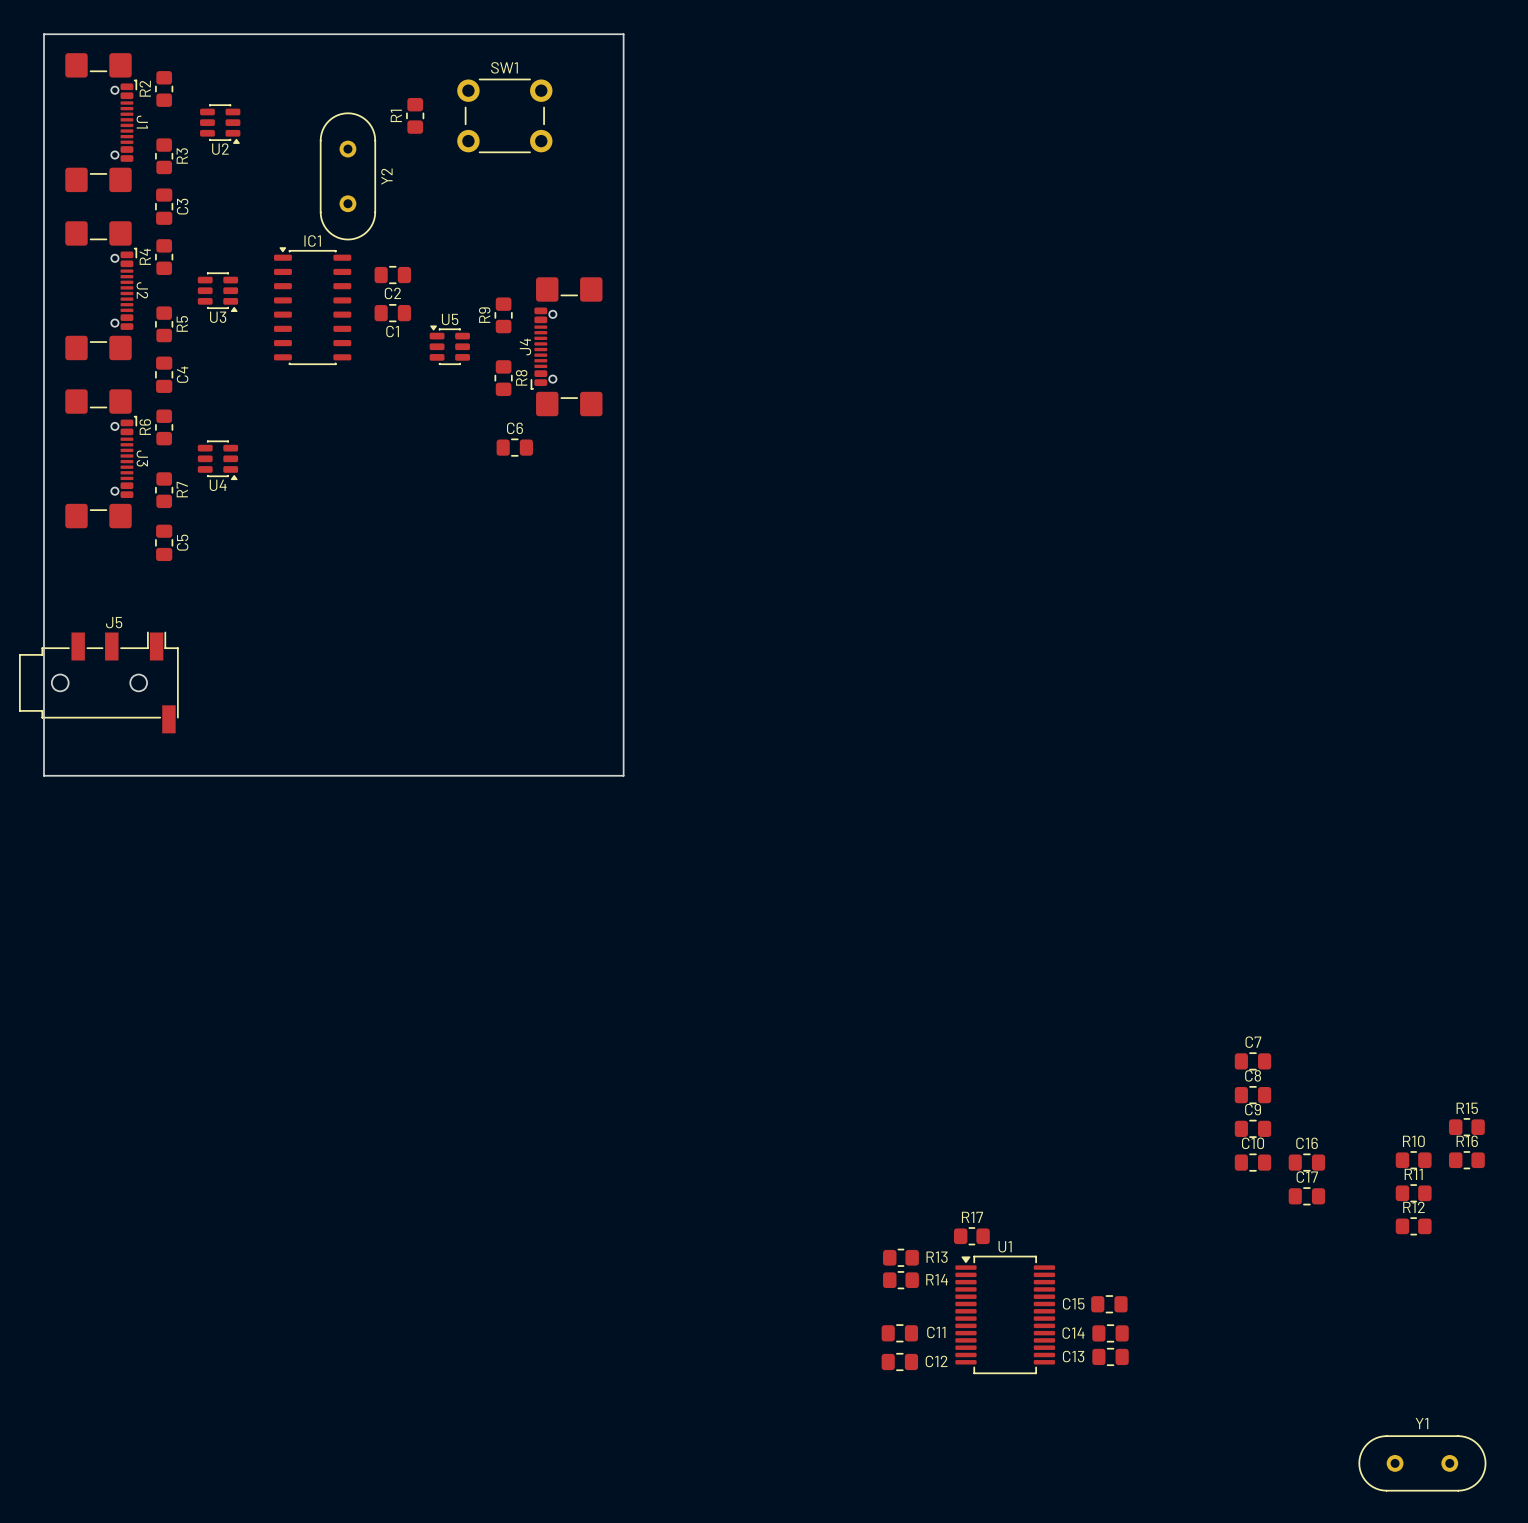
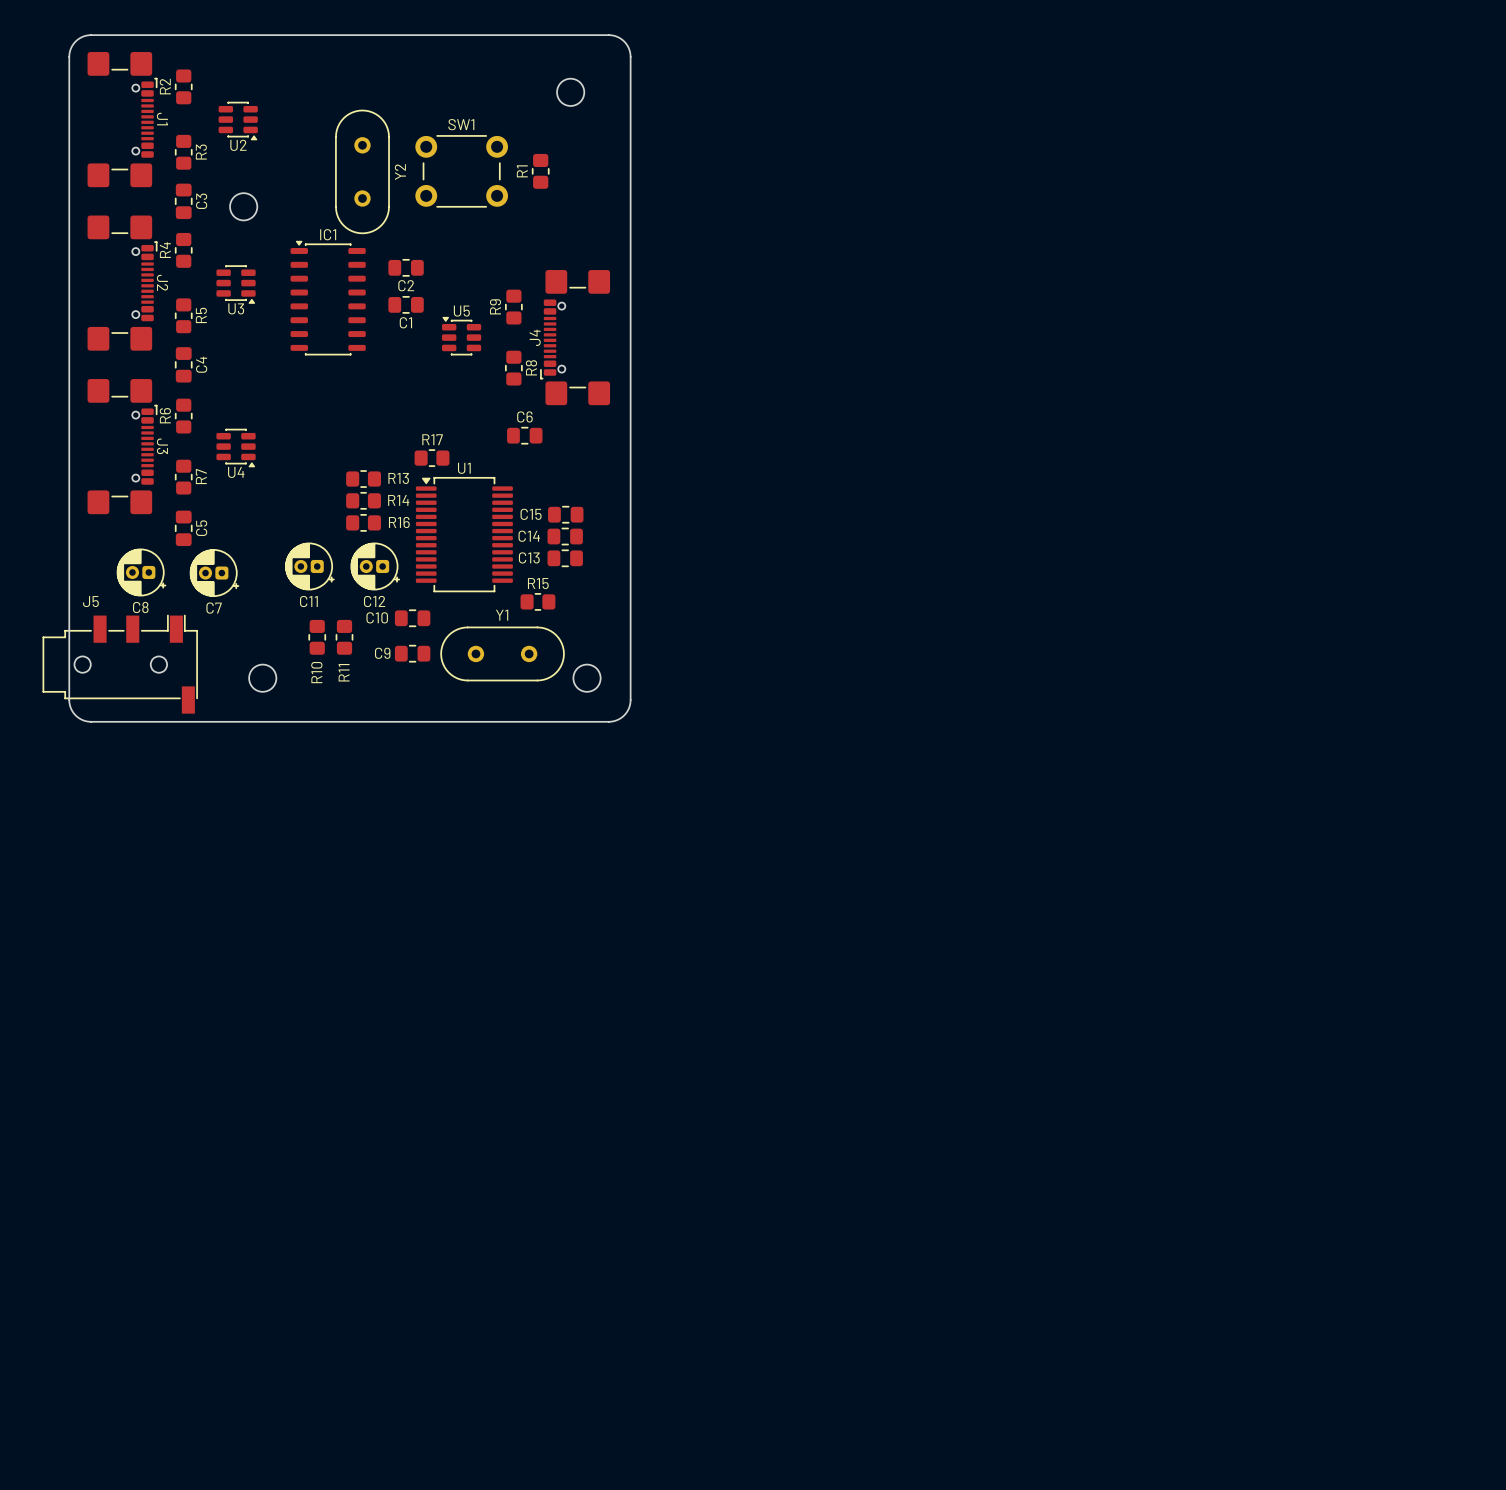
board edge: (623, 58) (623, 34) (43, 34) (43, 775) (623, 775) (623, 719) -> (630, 56) (628, 47) (624, 41) (618, 37) (608, 35) (91, 35) (83, 36) (75, 41) (71, 47) (69, 56) (69, 700) (74, 713) (81, 719) (91, 721) (608, 721) (616, 720) (624, 715) (629, 707) (630, 700)
round board edge: none -> [556, 78, 585, 107]
R1 position: (415, 115) -> (540, 171)
SW1 position: (504, 115) -> (461, 171)
round board edge: none -> [229, 192, 258, 221]
J5 name position: J5 (114, 622) -> J5 (90, 601)
round board edge: none -> [248, 664, 277, 693]
round board edge: none -> [573, 664, 601, 693]
C7 name position: C7 (1253, 1042) -> C7 (214, 608)
C7 footprint: [1234, 1052, 1272, 1071] -> [189, 549, 240, 597]
C8 name position: C8 (1253, 1075) -> C8 (140, 607)
C8 footprint: [1234, 1086, 1272, 1105] -> [116, 548, 167, 597]
C9 name position: C9 (1253, 1109) -> C9 (382, 653)
R15 position: (1466, 1127) -> (537, 601)
C9 position: (1252, 1128) -> (412, 653)
R10 name position: R10 (1413, 1141) -> R10 (316, 672)
R16 name position: R16 (1467, 1141) -> R16 (399, 522)
C10 name position: C10 (1253, 1143) -> C10 (377, 617)
R10 rotation: 0° (1413, 1160) -> 90° clockwise (317, 637)
R10 position: (1413, 1160) -> (317, 637)
R16 position: (1466, 1160) -> (363, 522)
C10 position: (1252, 1162) -> (412, 618)
C16: (1306, 1162) -> none
R11 name position: R11 (1413, 1174) -> R11 (344, 672)
R11 rotation: 0° (1413, 1193) -> 90° clockwise (344, 637)
R11 position: (1413, 1193) -> (344, 637)
C17: (1306, 1196) -> none
R12: (1413, 1226) -> none
R17 position: (971, 1236) -> (432, 458)
R13 position: (900, 1257) -> (363, 479)
R14 position: (900, 1280) -> (363, 500)
C15 position: (1109, 1304) -> (565, 514)
U1 position: (1005, 1314) -> (464, 534)
C11 footprint: [881, 1324, 919, 1343] -> [285, 542, 335, 591]
C11 name position: C11 (936, 1332) -> C11 (308, 601)
C14 position: (1110, 1333) -> (565, 536)
C12 footprint: [881, 1353, 919, 1371] -> [350, 542, 400, 591]
C13 position: (1110, 1356) -> (565, 558)
C12 name position: C12 (936, 1361) -> C12 (374, 601)
Y1 position: (1422, 1463) -> (502, 653)

